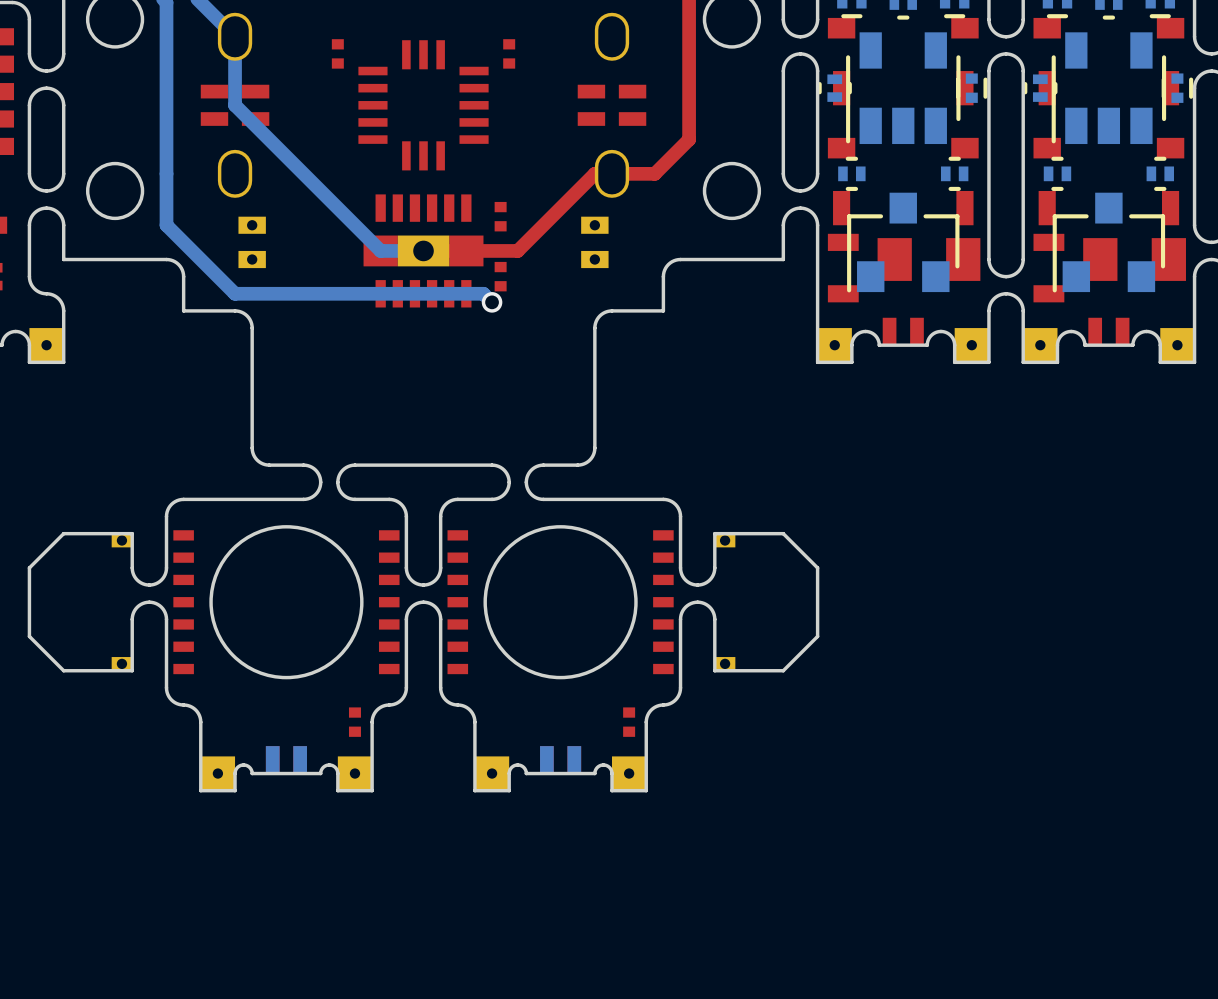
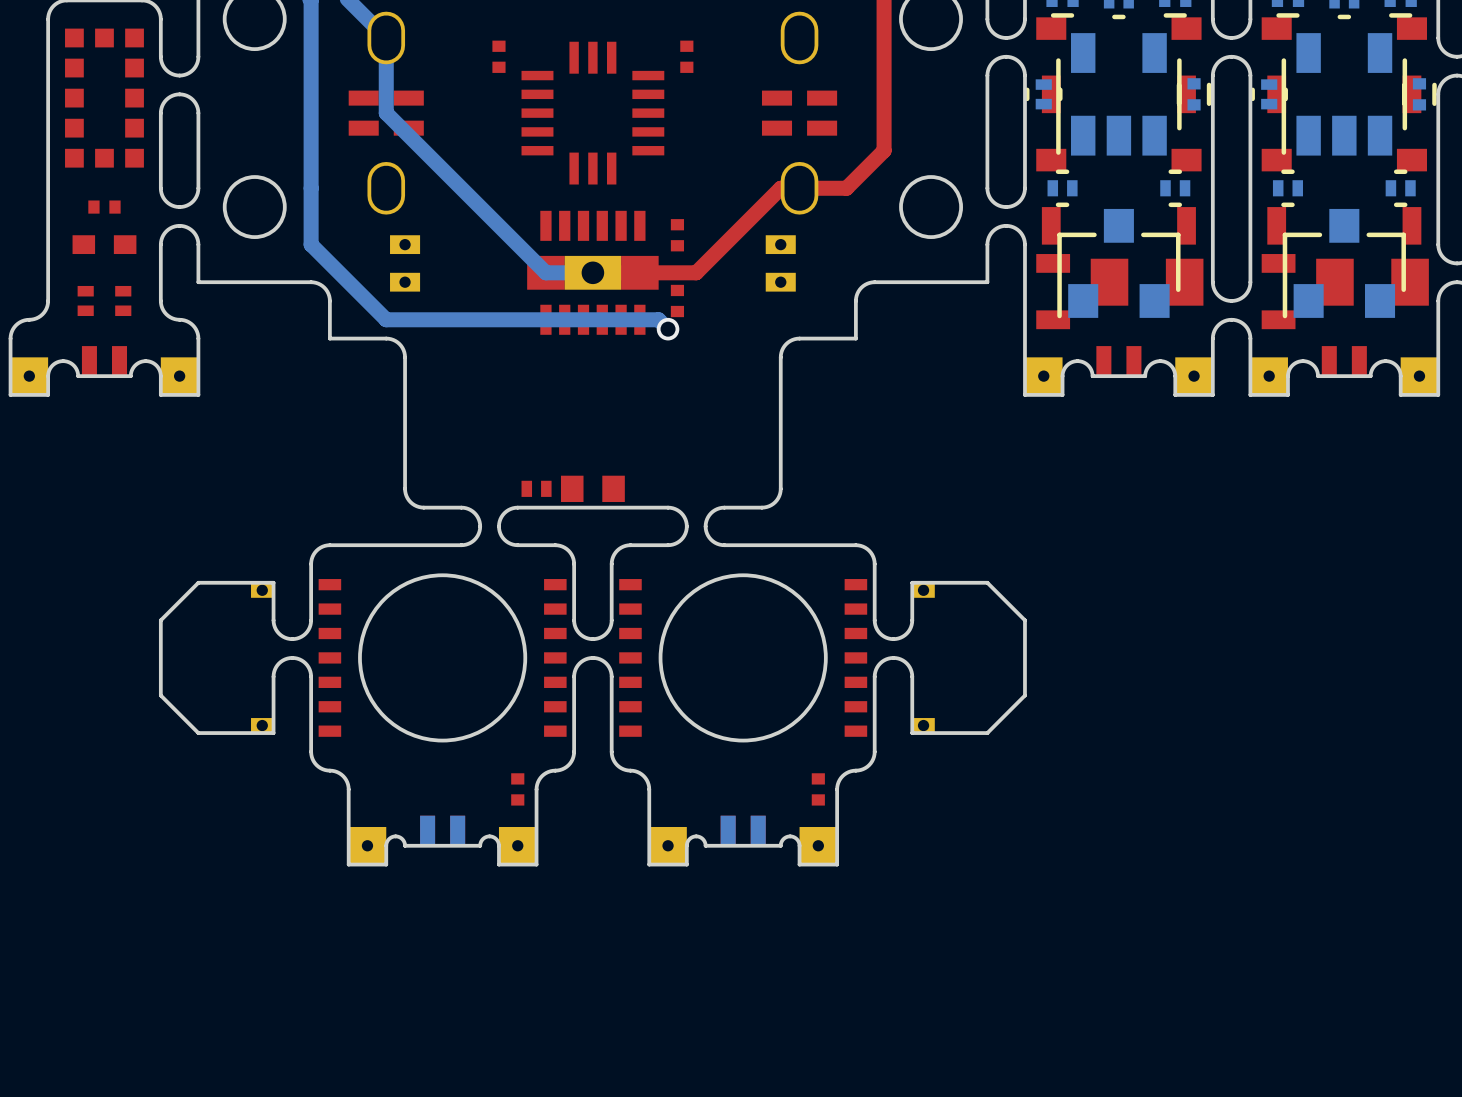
part: none -> (536, 488)
part: none -> (592, 488)

